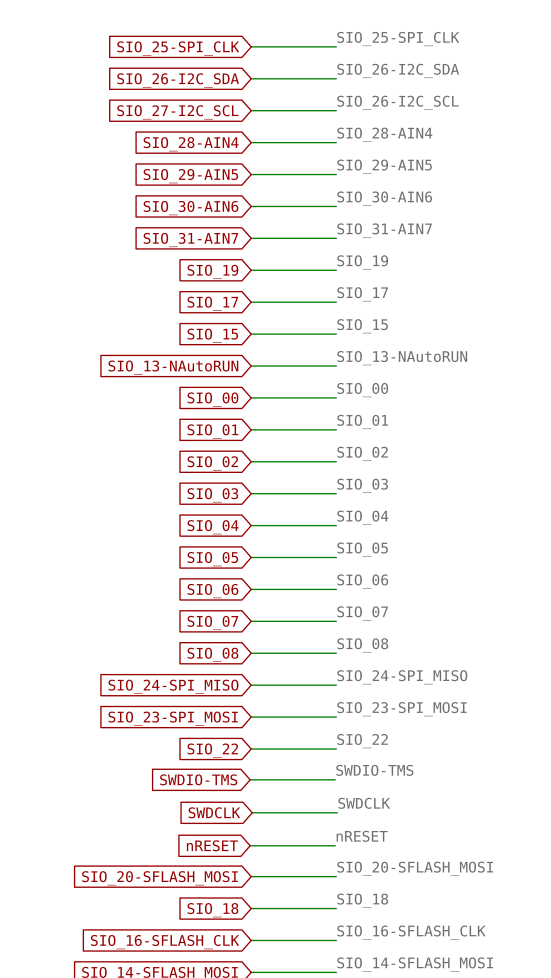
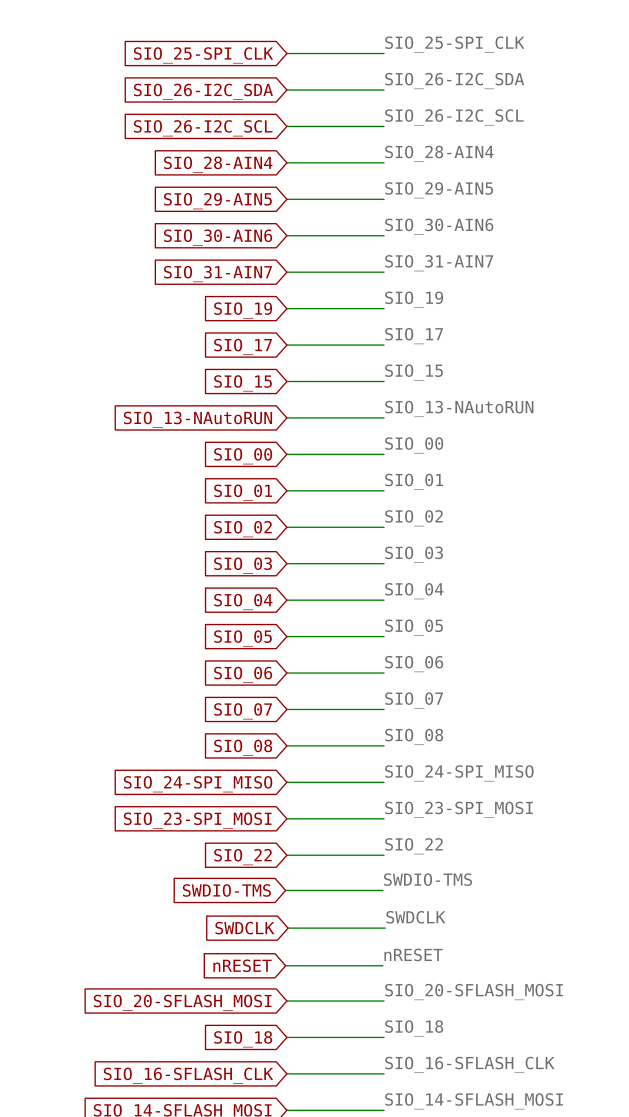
global label: SIO_27-I2C_SCL (177, 112) -> SIO_26-I2C_SCL (203, 128)

